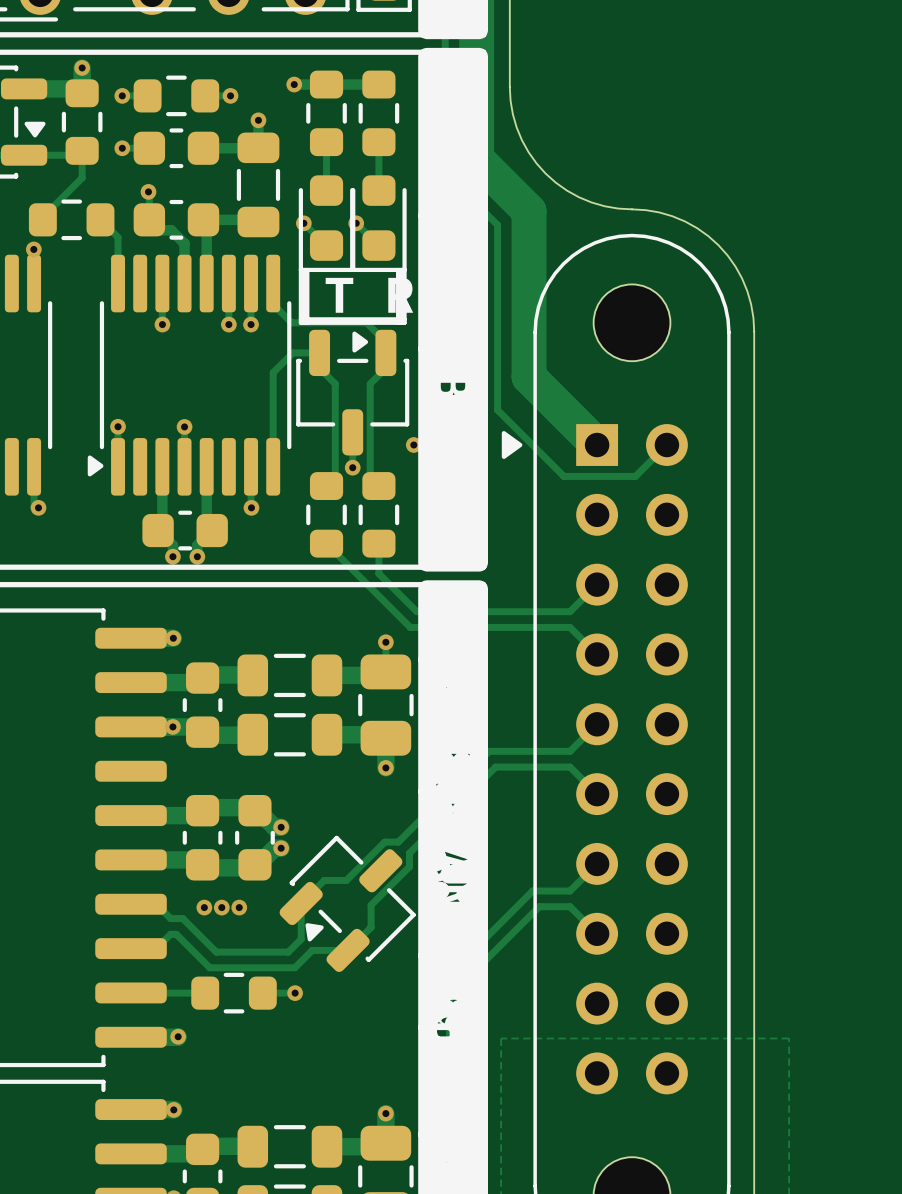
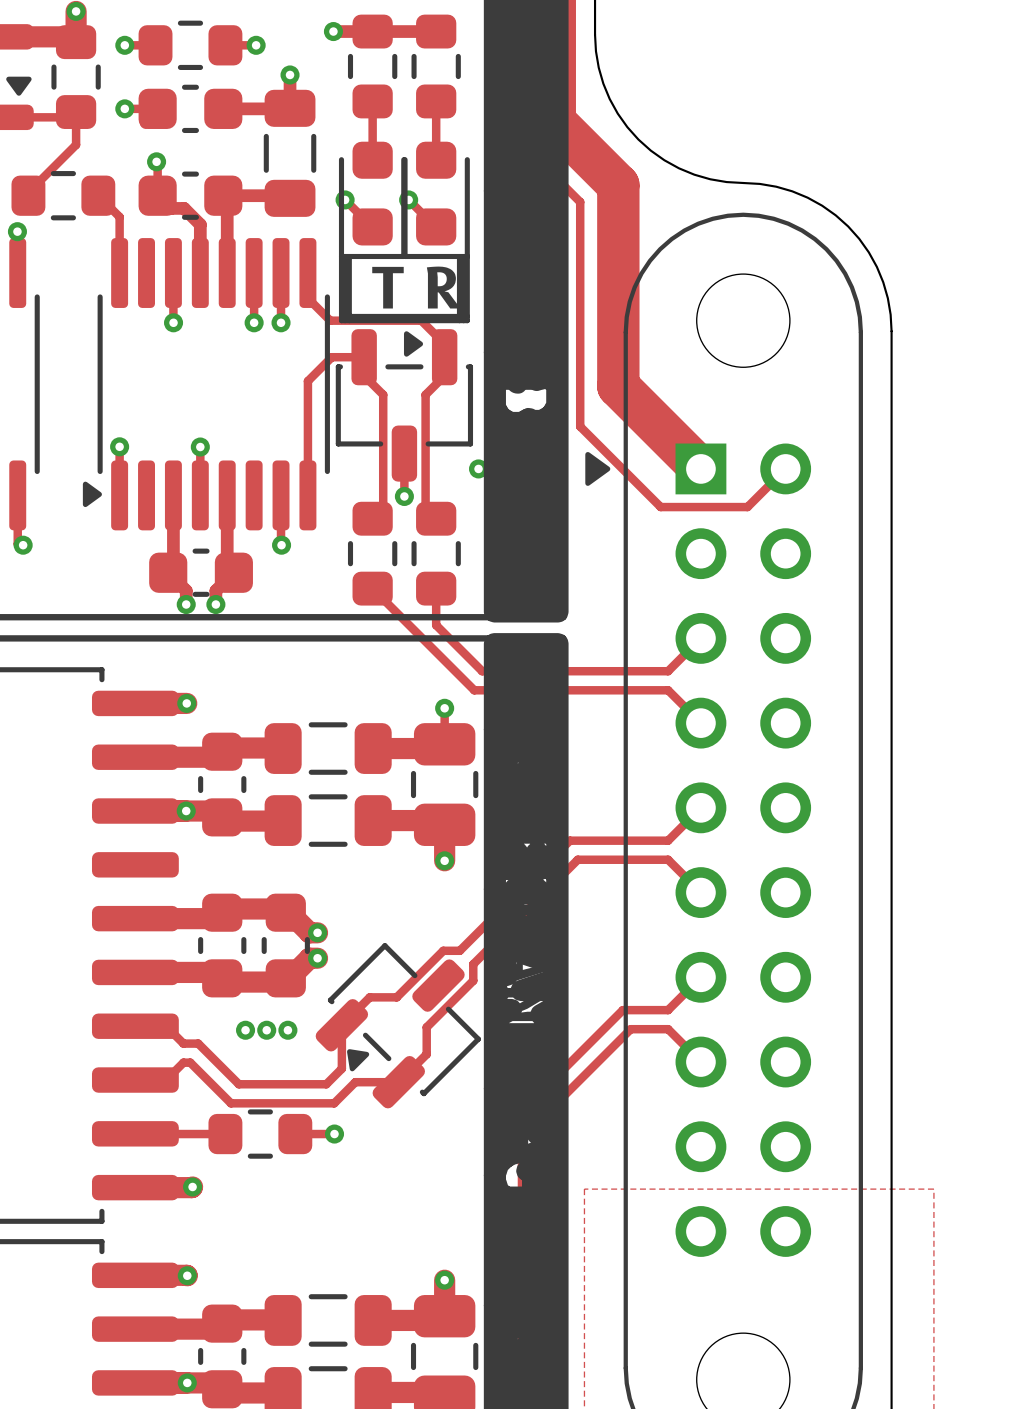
via position: (204, 907) -> (287, 1030)

